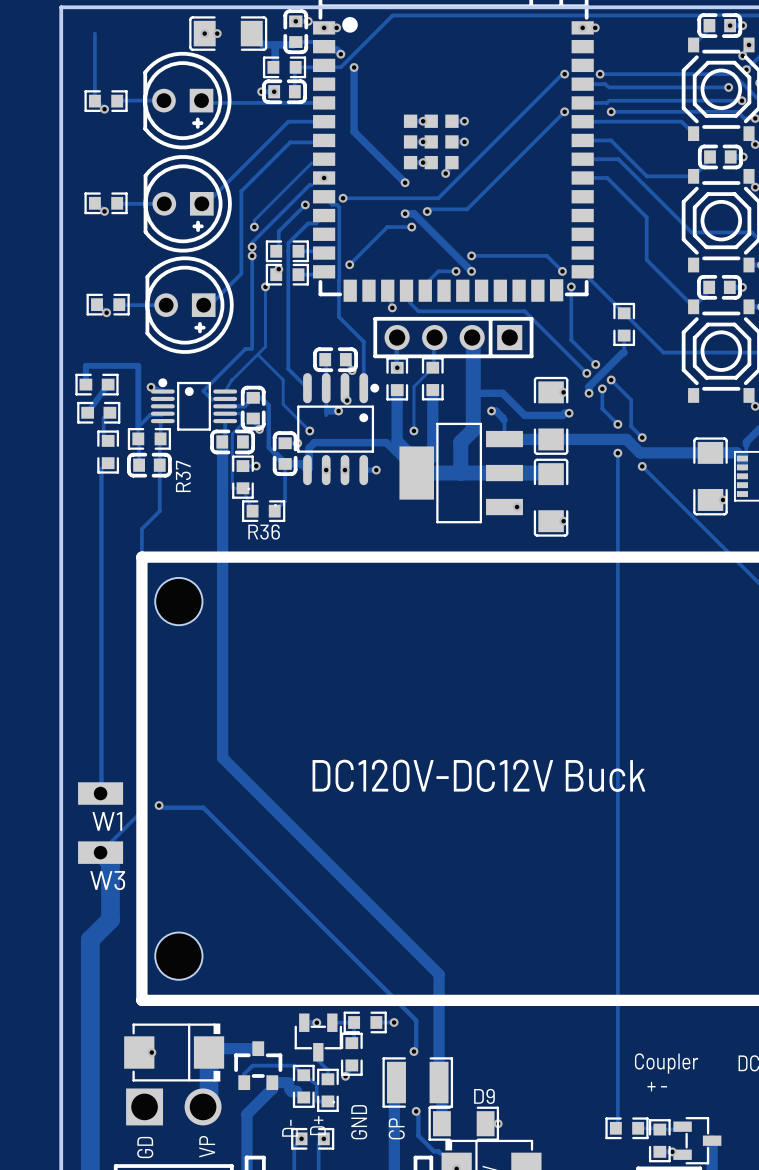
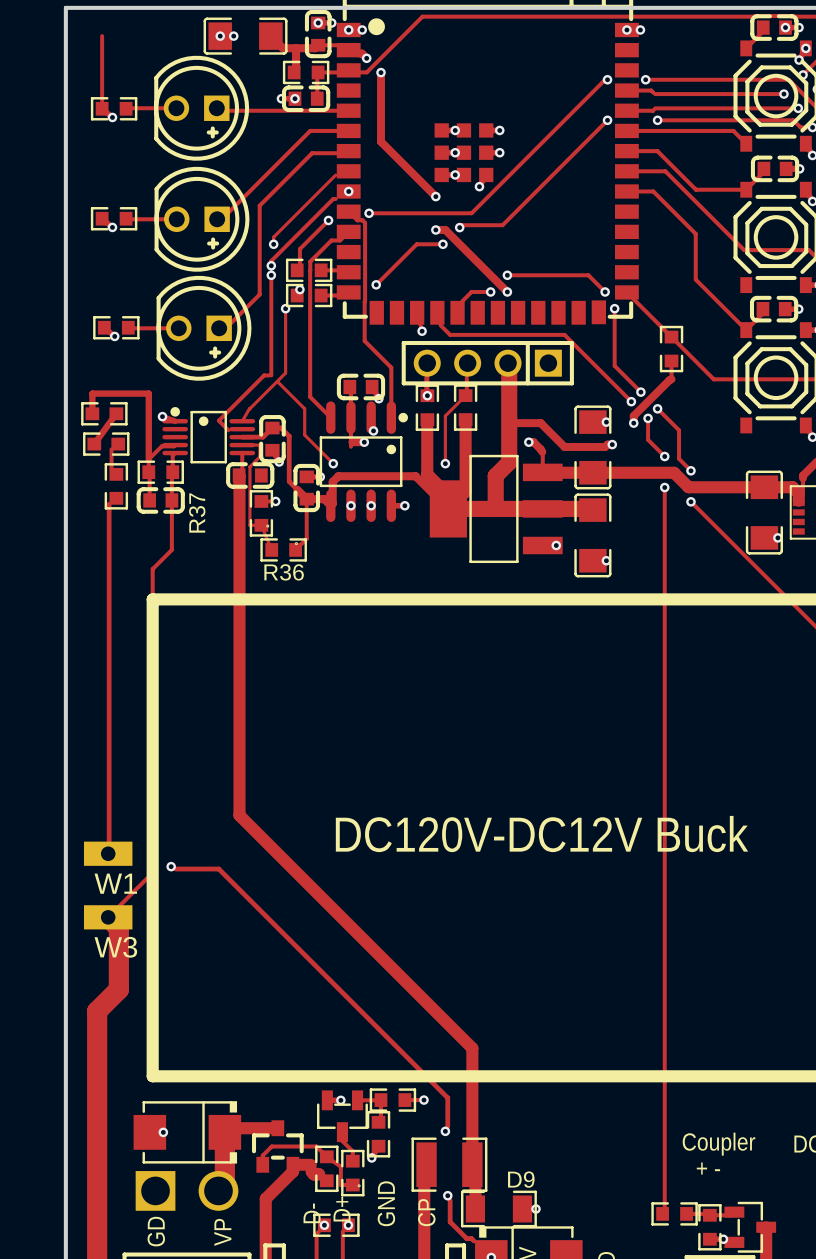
part: (178, 601) -> none
part: (178, 956) -> none

